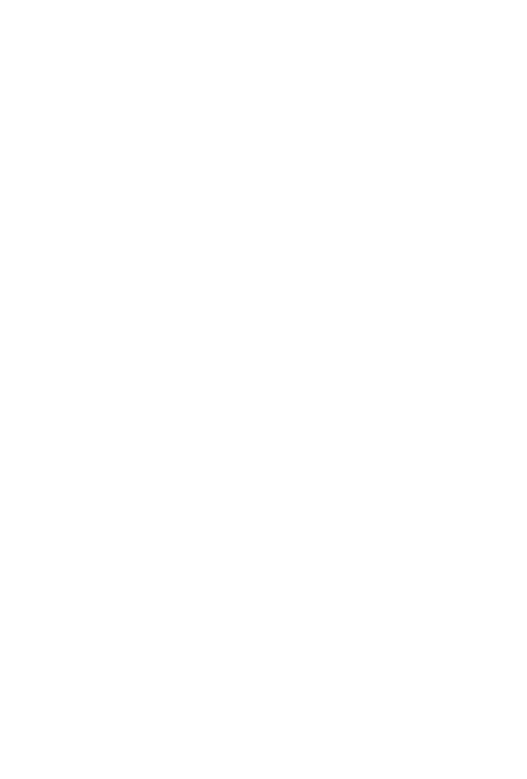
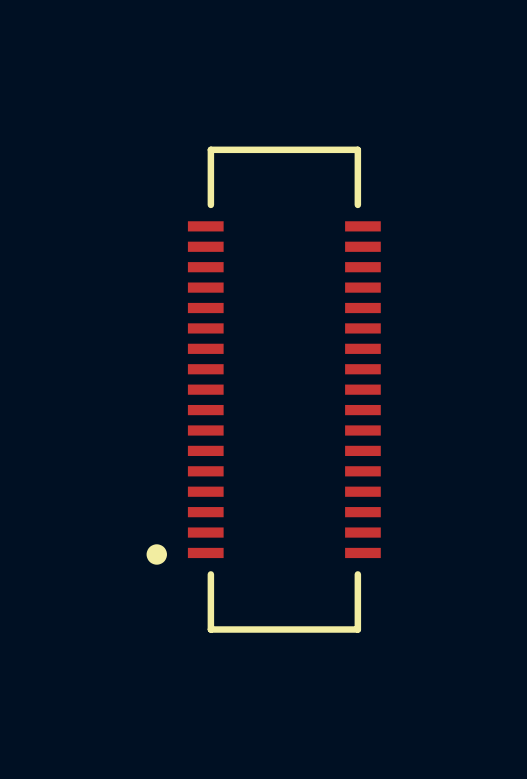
part: none -> (263, 389)

